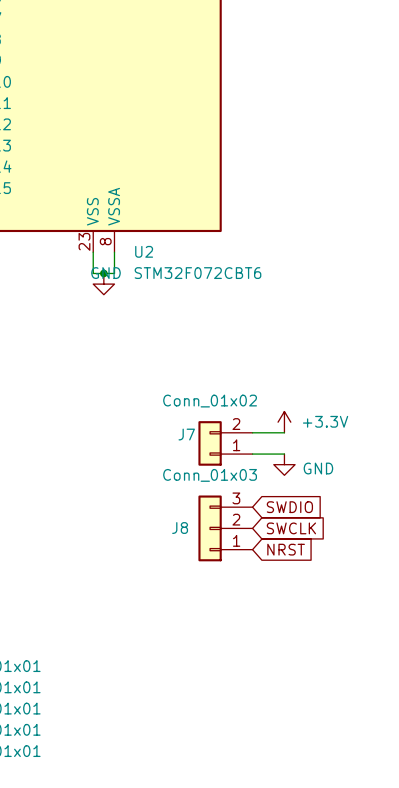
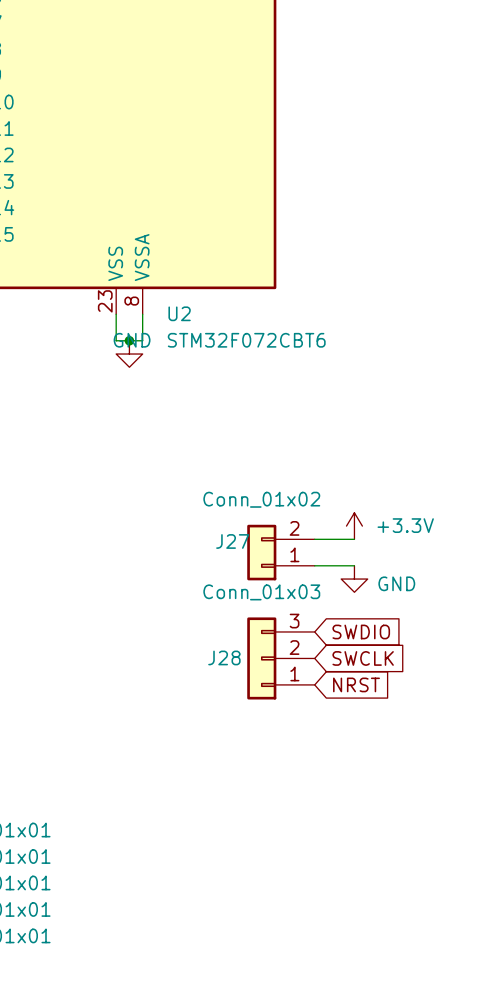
J7 name: J7 (186, 434) -> J27 (232, 541)
J8 name: J8 (180, 528) -> J28 (224, 657)

